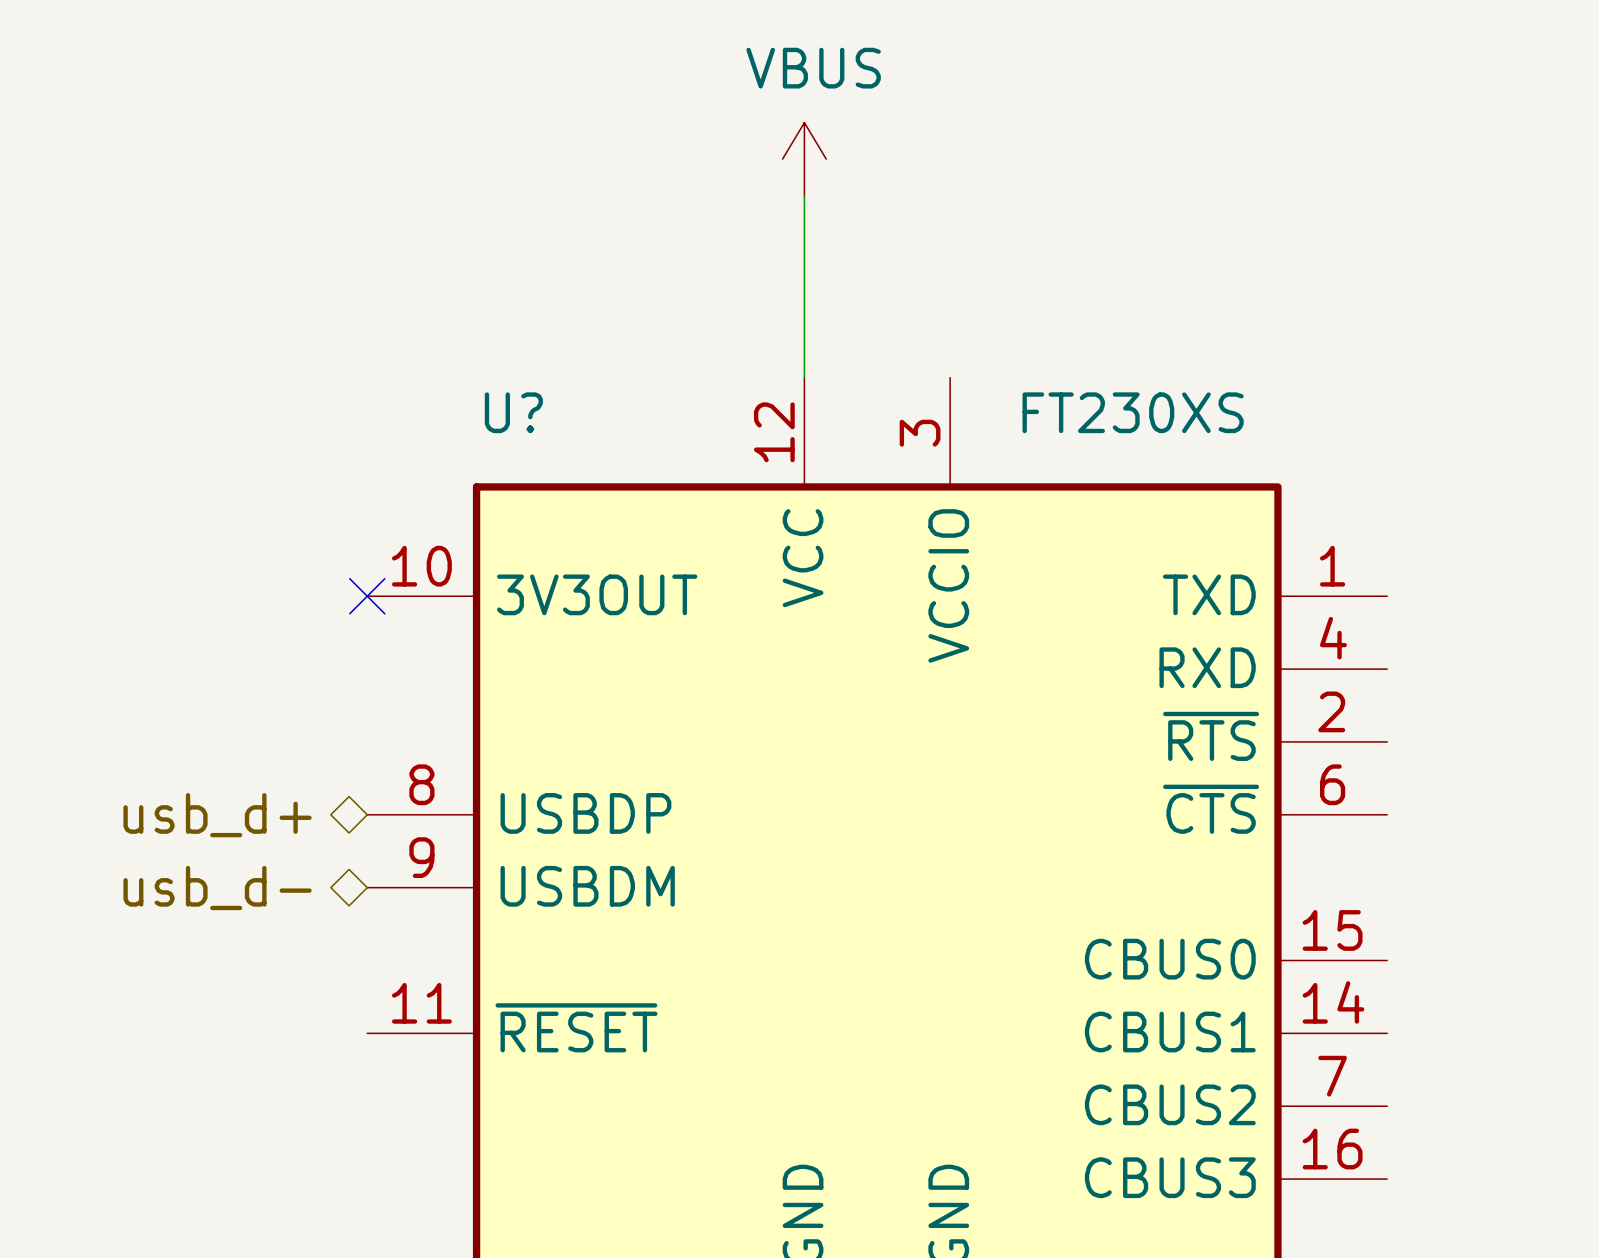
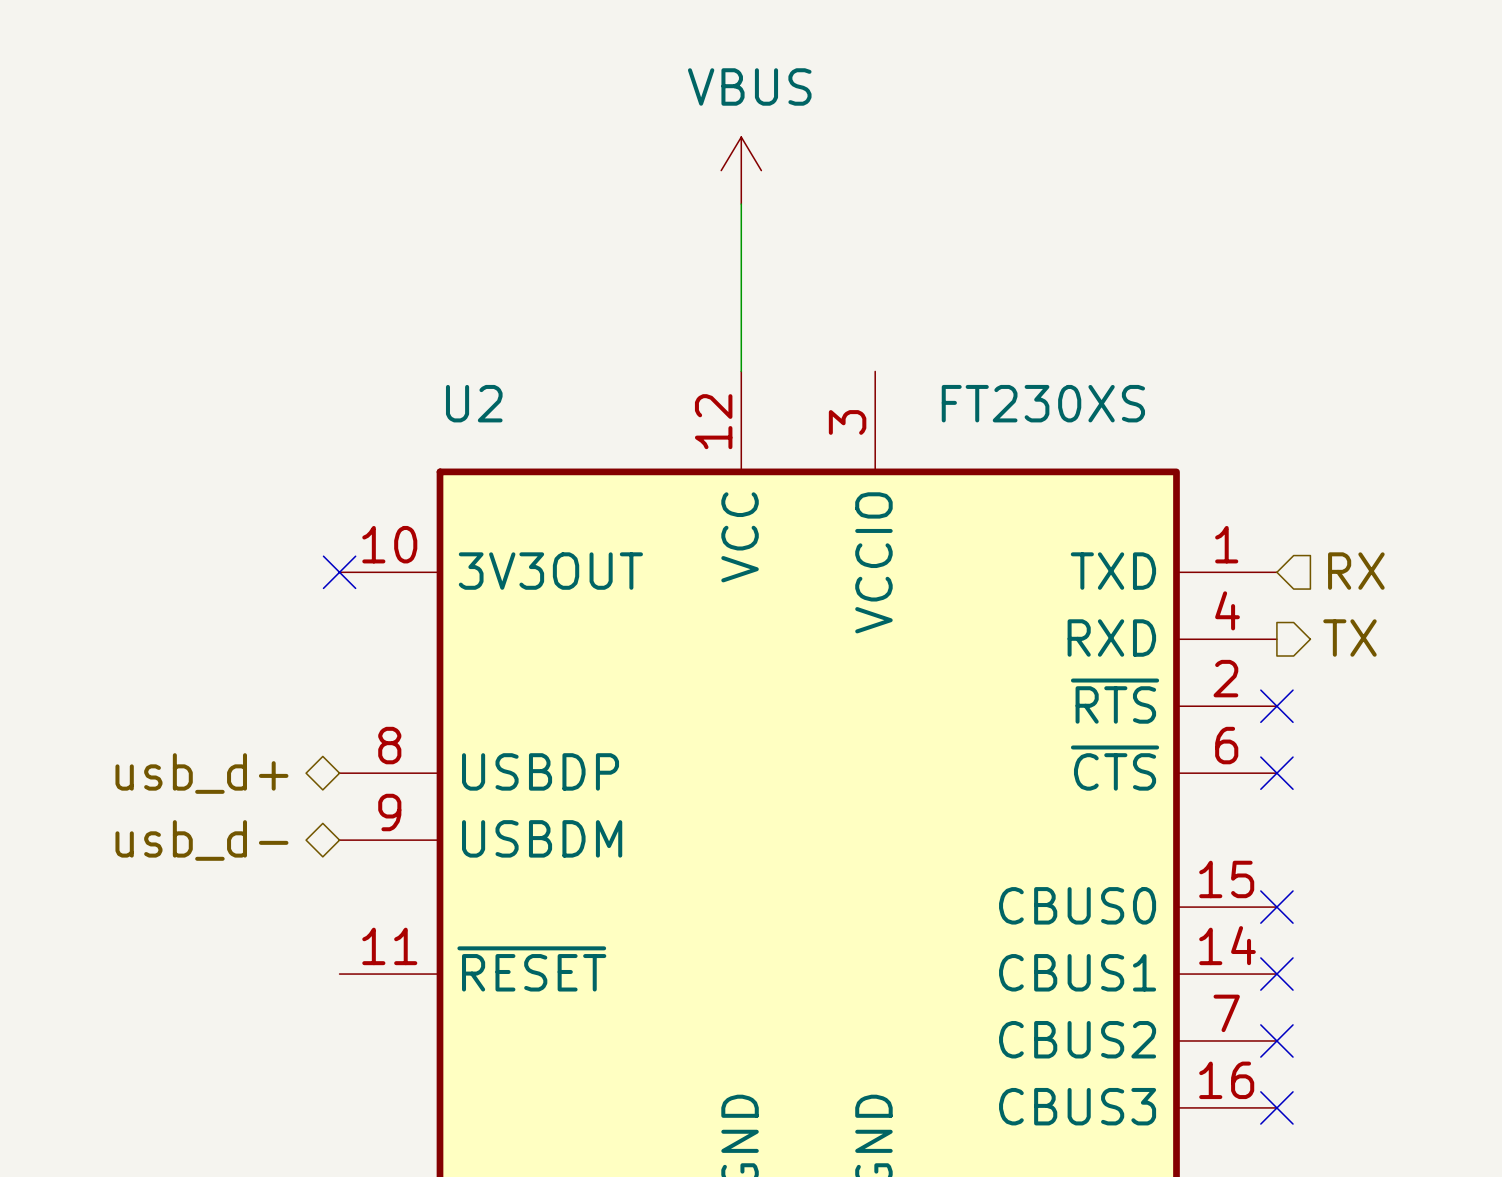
U? name: U? (513, 412) -> U2 (474, 403)
hierarchical label: none -> RX (1356, 571)
hierarchical label: none -> TX (1349, 638)
no-connect mark: none -> (1276, 706)
no-connect mark: none -> (1276, 773)
no-connect mark: none -> (1276, 907)
no-connect mark: none -> (1276, 974)
no-connect mark: none -> (1276, 1040)
no-connect mark: none -> (1276, 1107)

